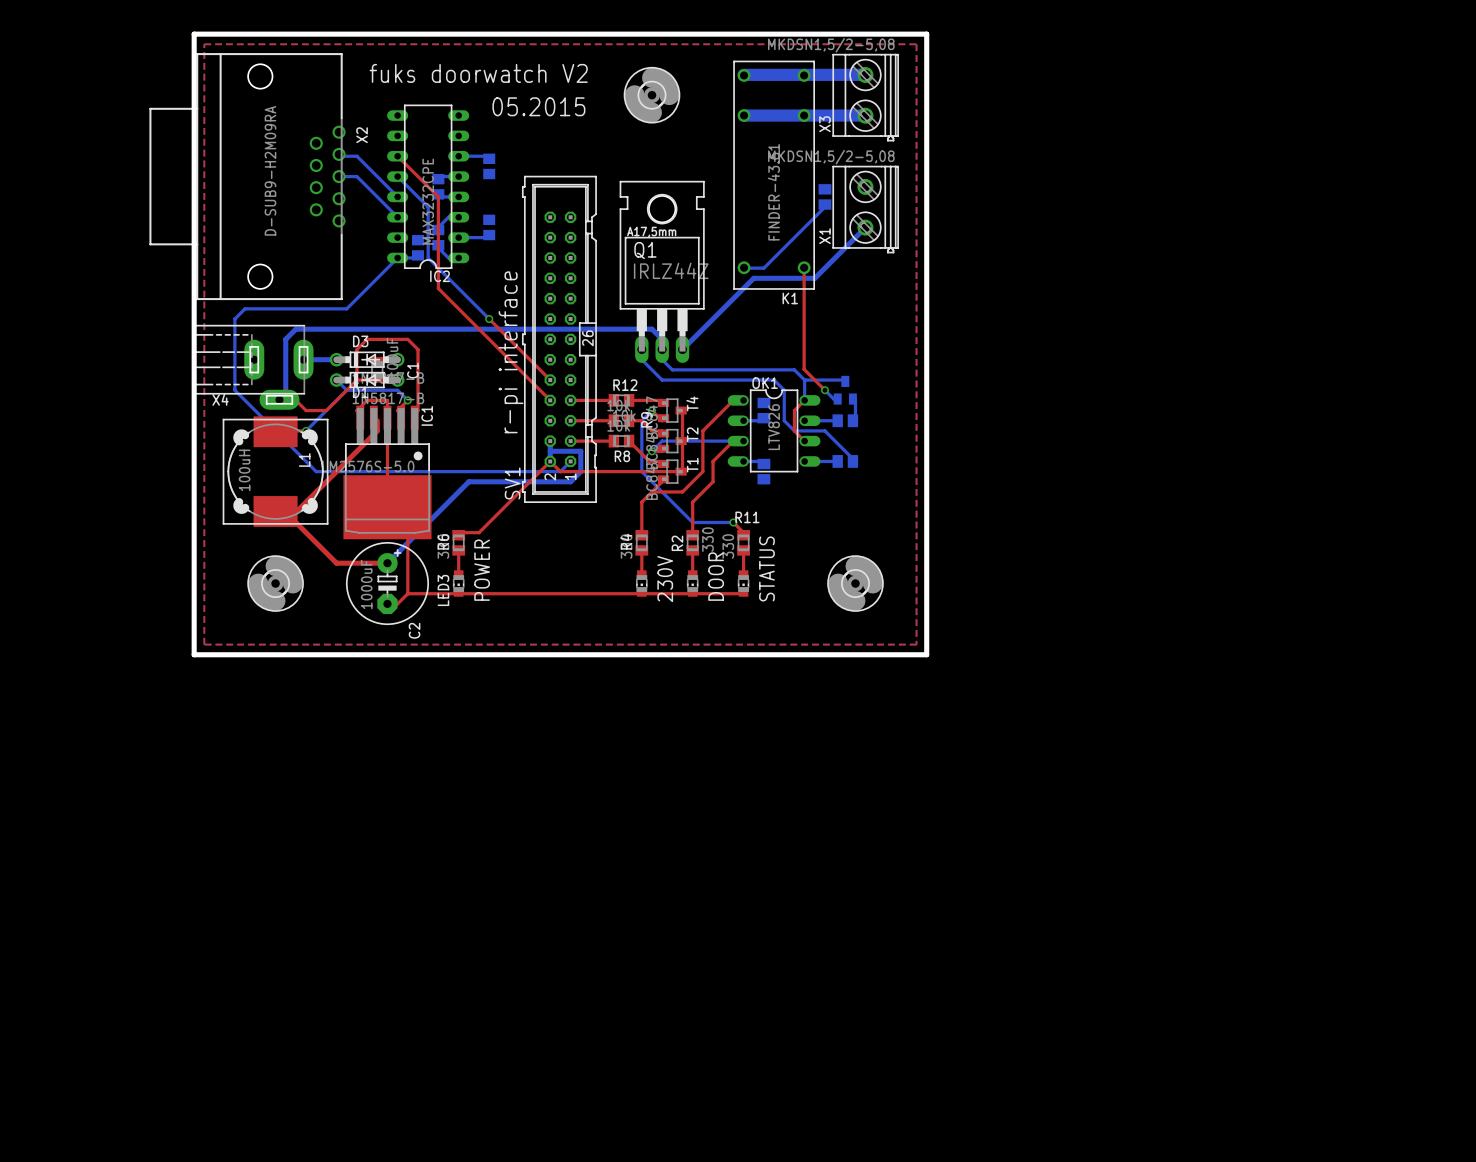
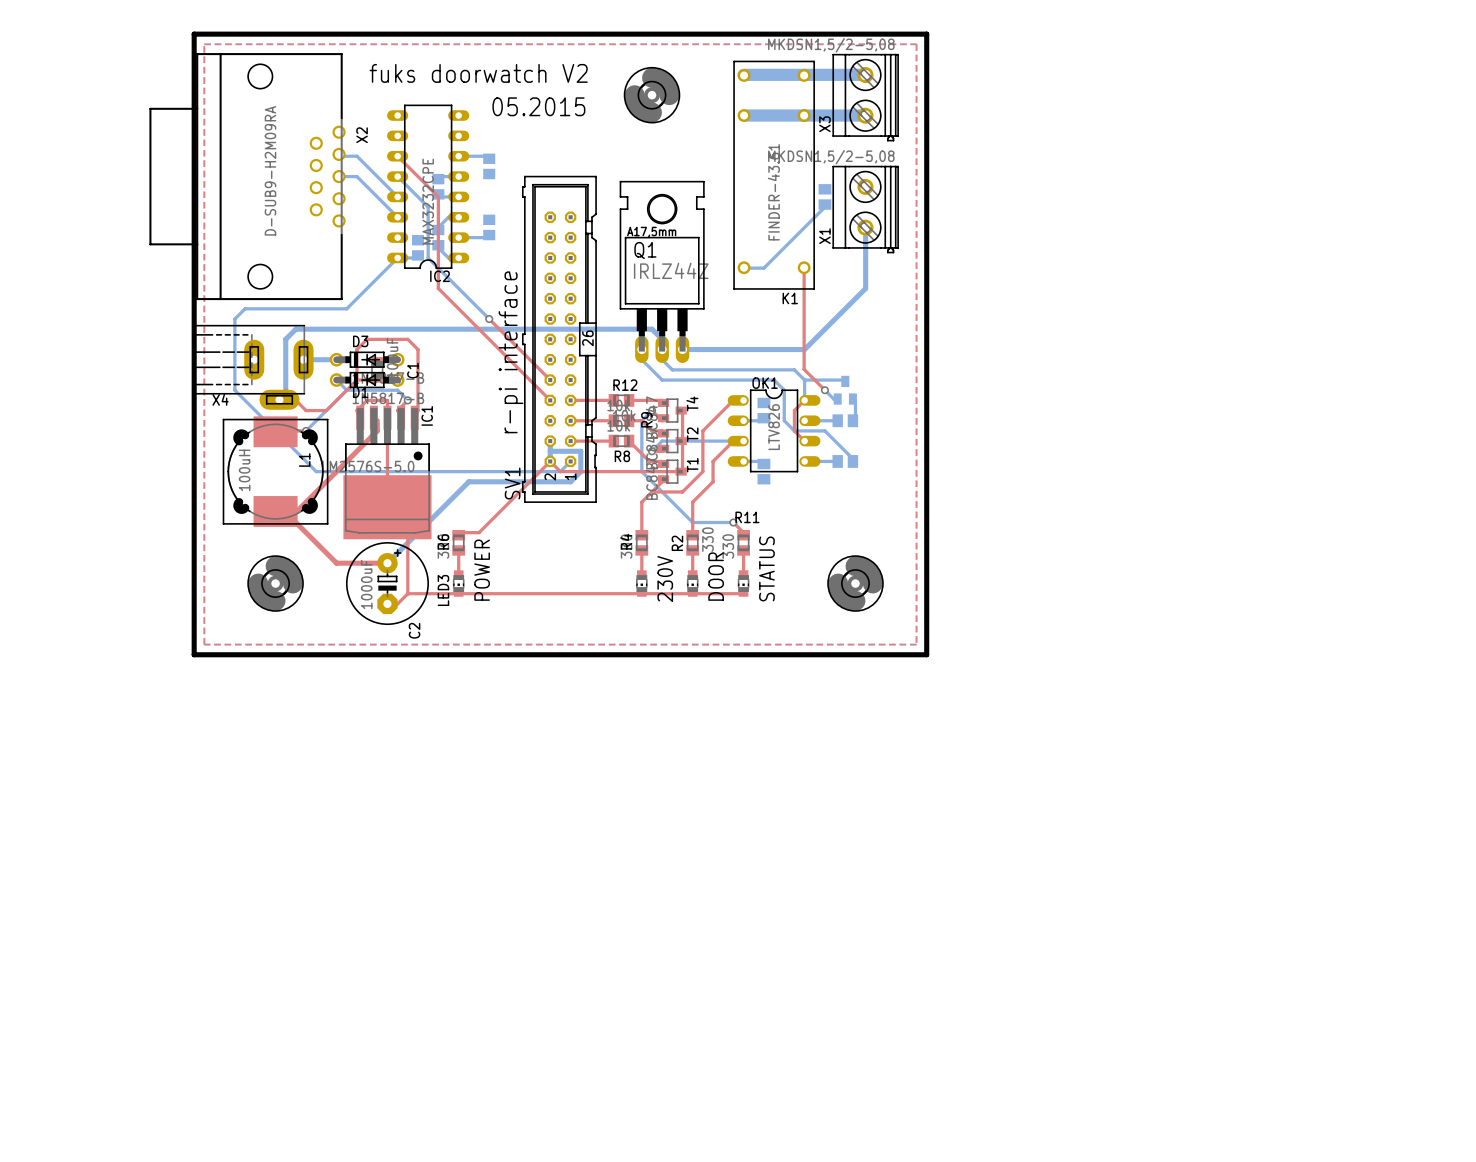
bottom track: (865, 227) (814, 278) (753, 278) (682, 349) -> (865, 227) (865, 288) (804, 349) (682, 349)

